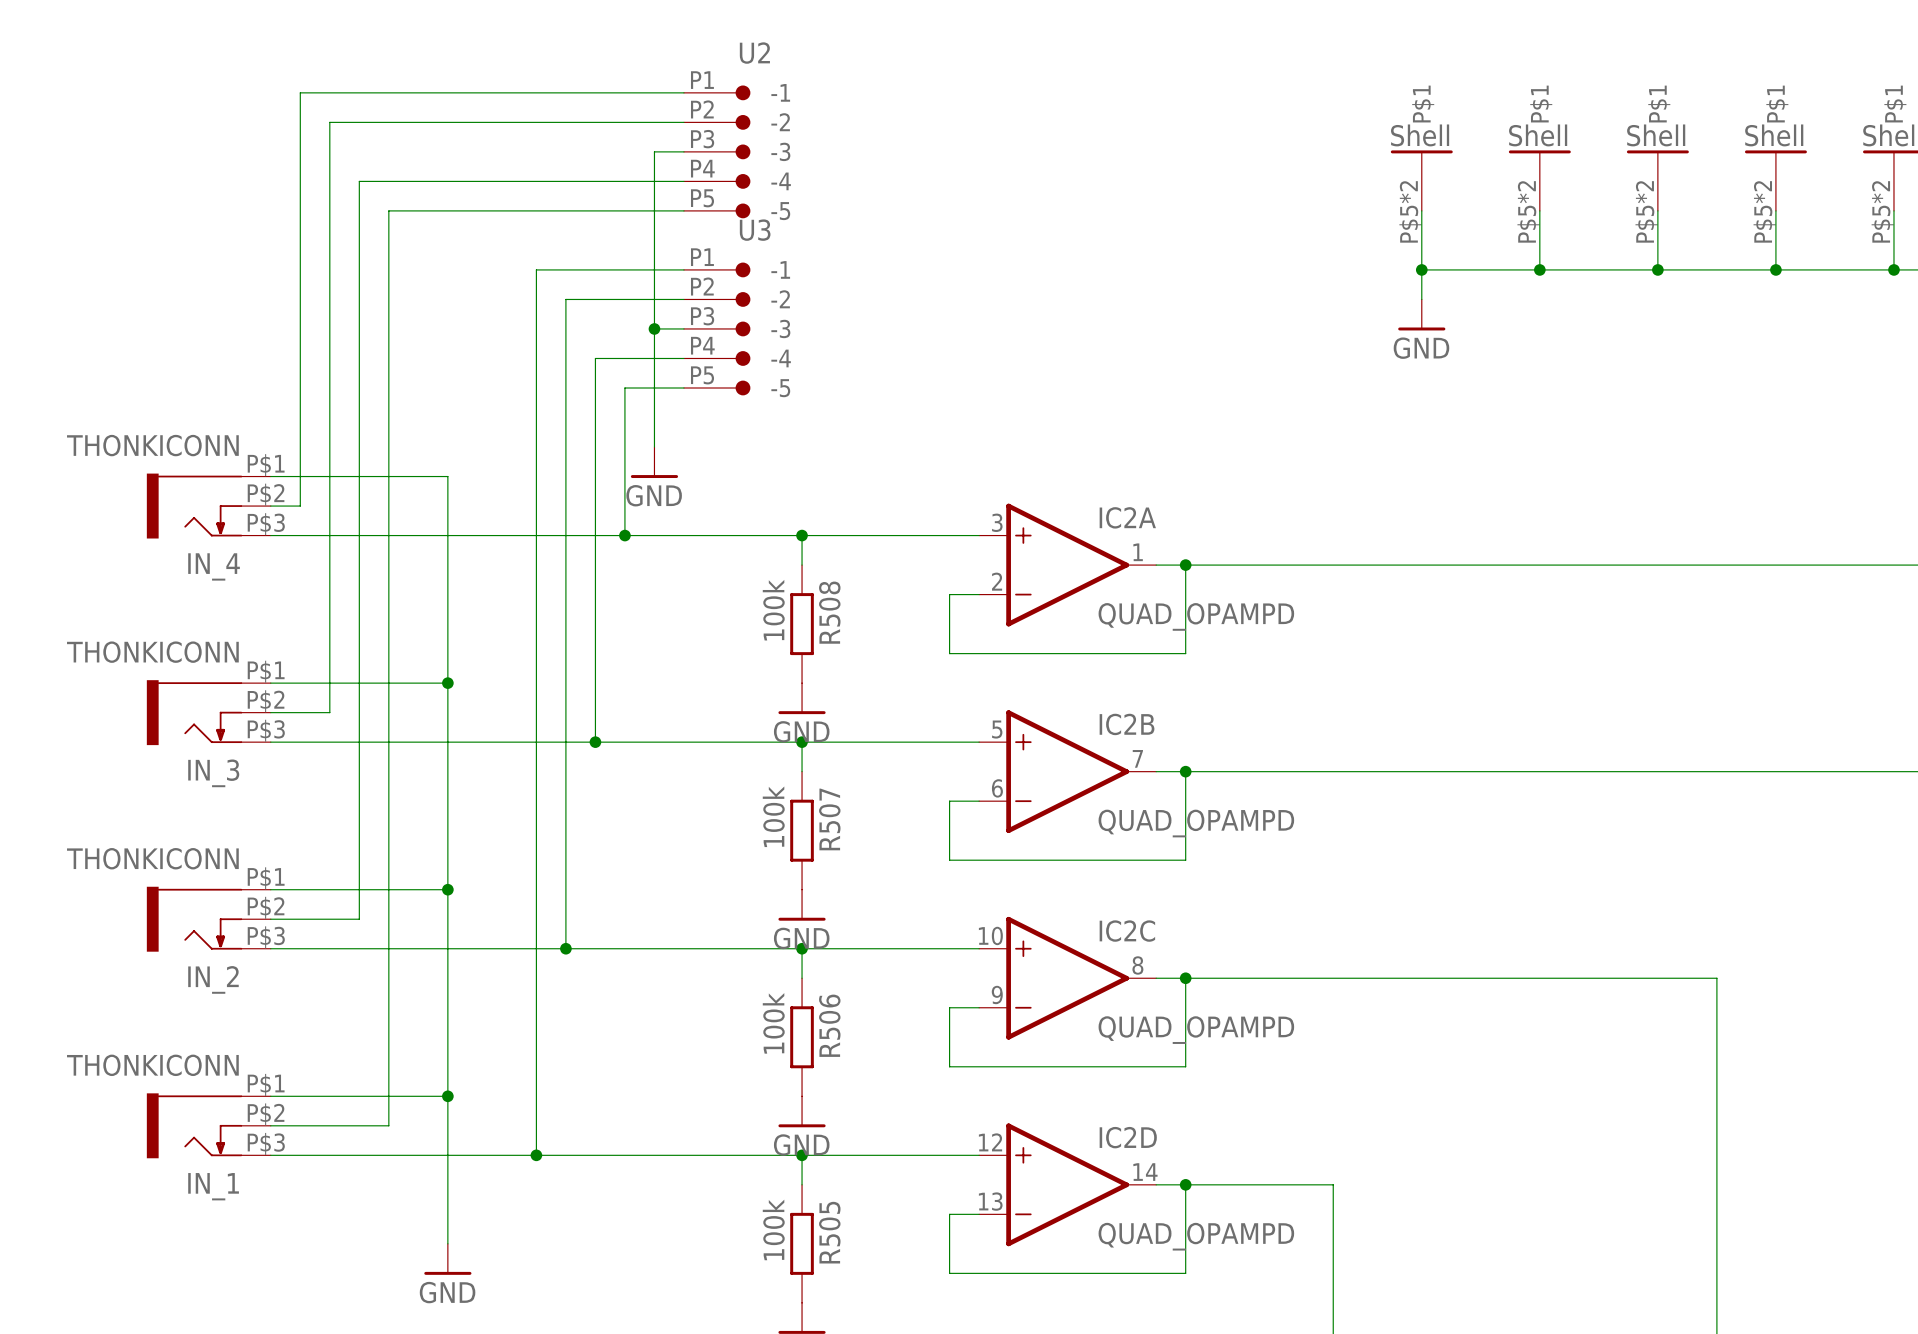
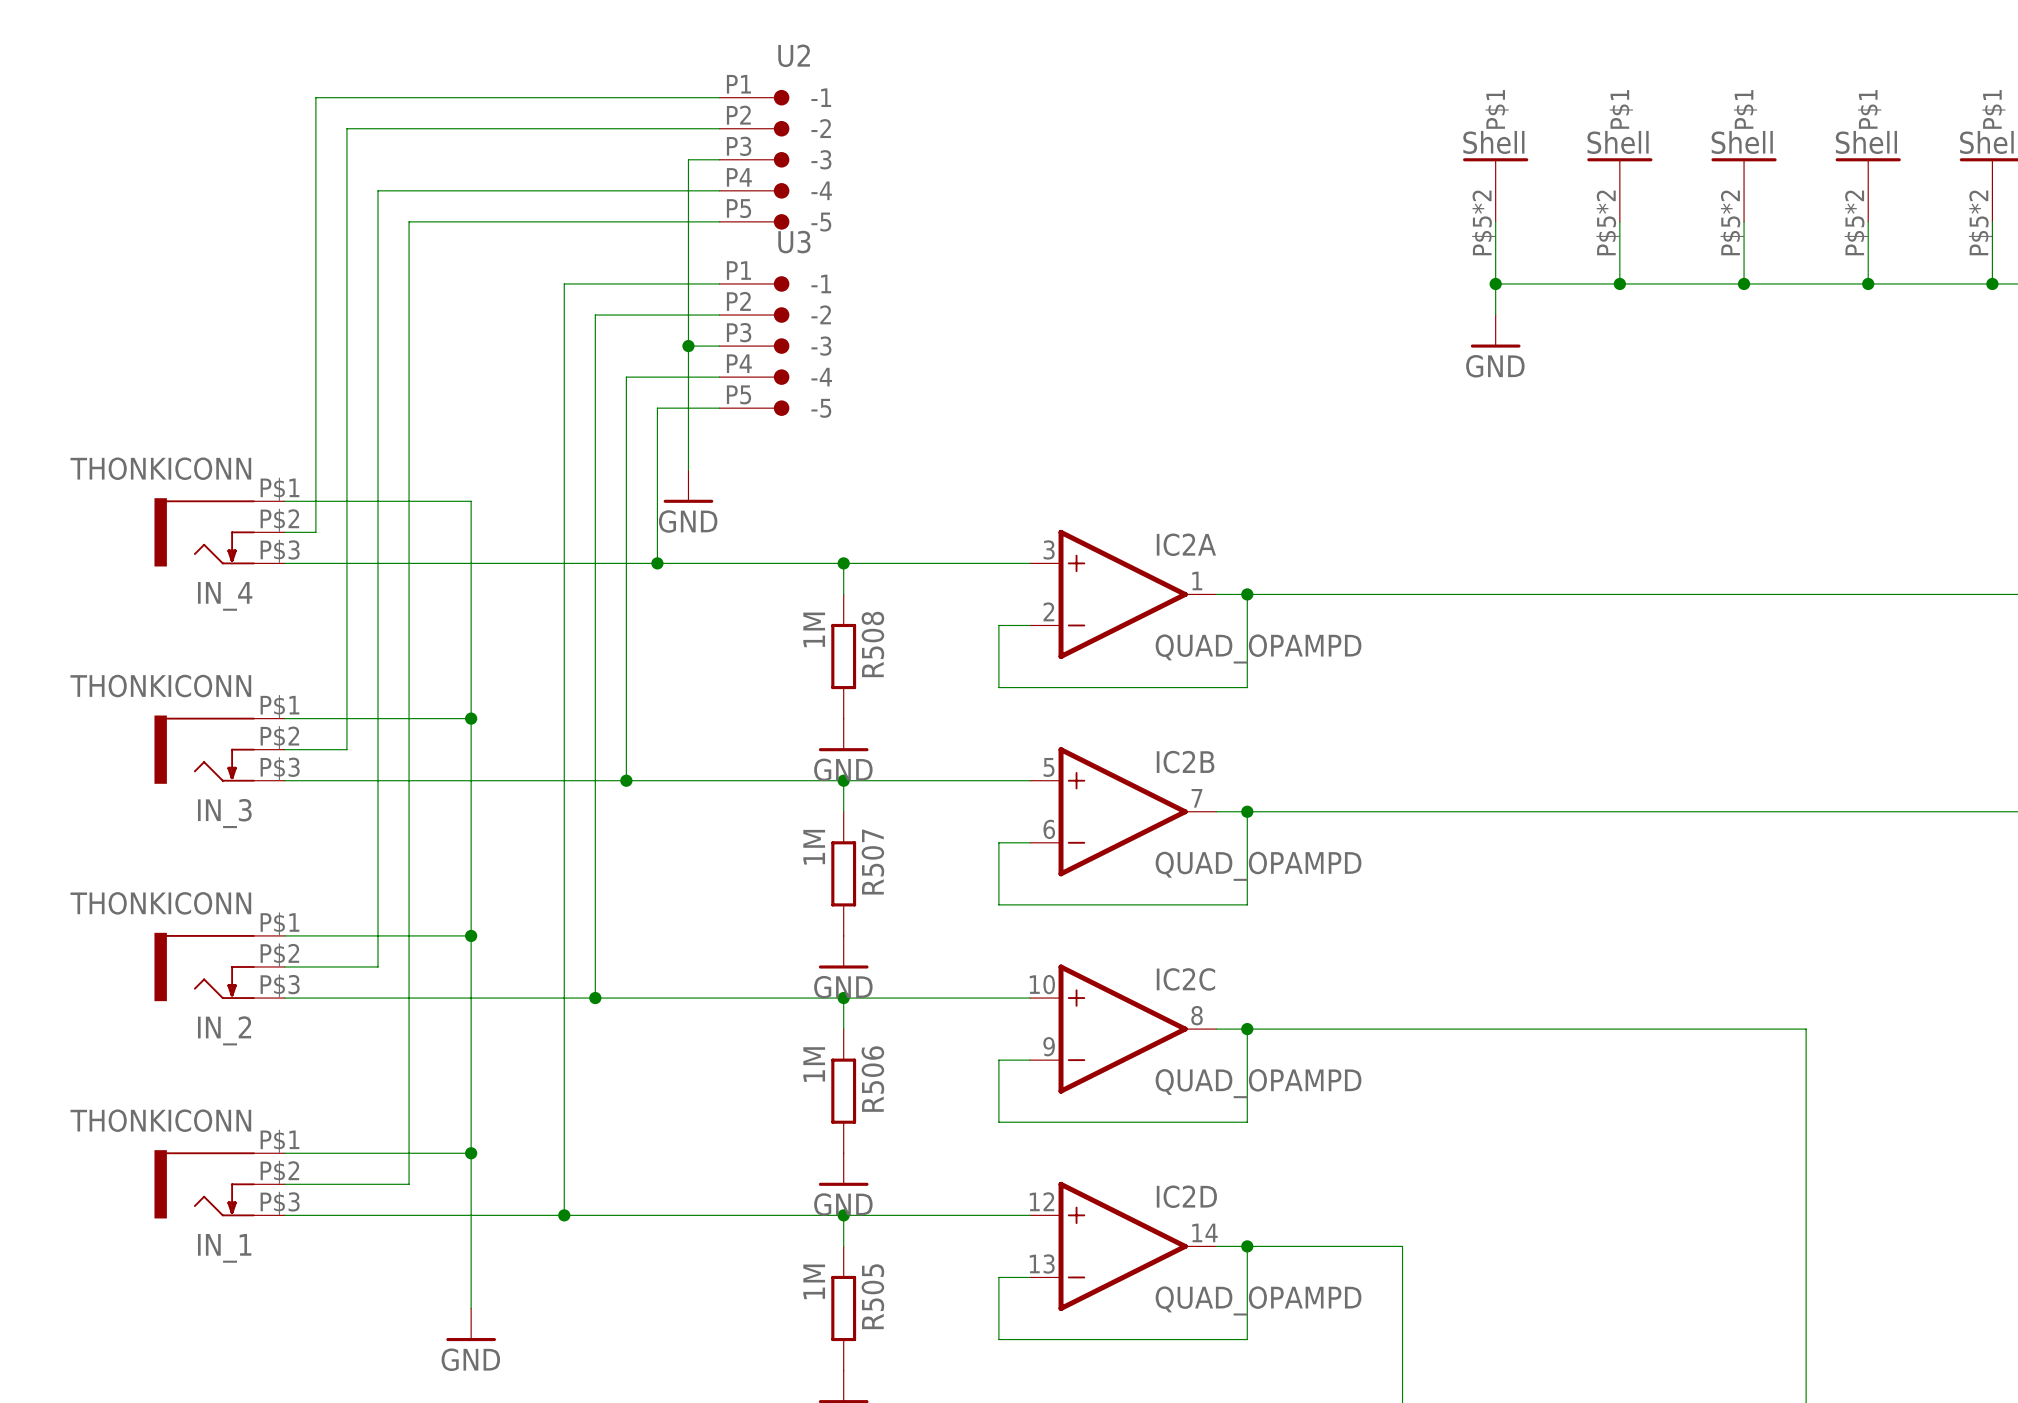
R508 value: 100k (773, 610) -> 1M (814, 629)
R507 value: 100k (773, 816) -> 1M (814, 847)
R506 value: 100k (773, 1023) -> 1M (814, 1064)
R505 value: 100k (773, 1229) -> 1M (814, 1281)

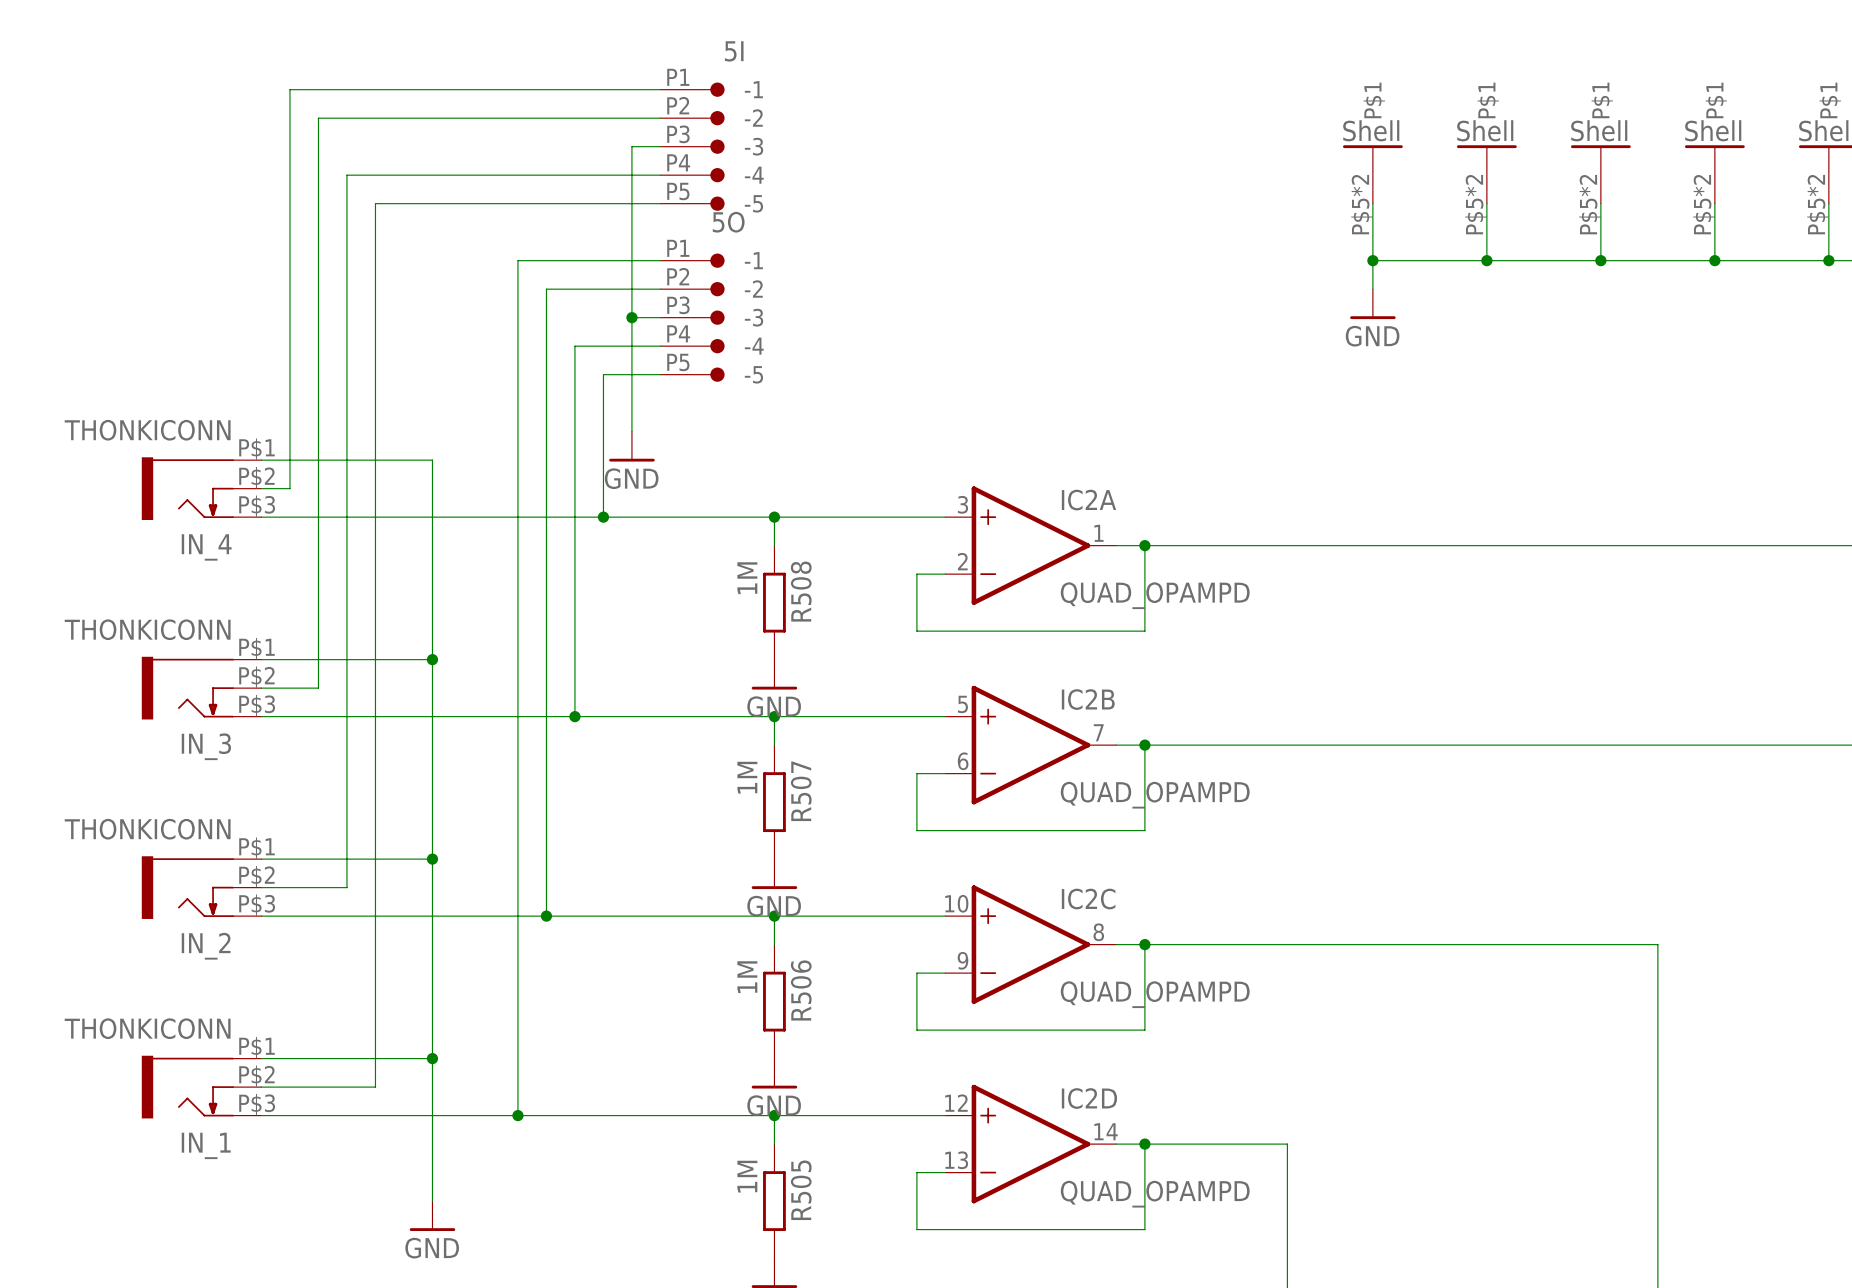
U2 name: U2 (794, 55) -> 5I (734, 51)
U3 name: U3 (794, 242) -> 5O (728, 222)

